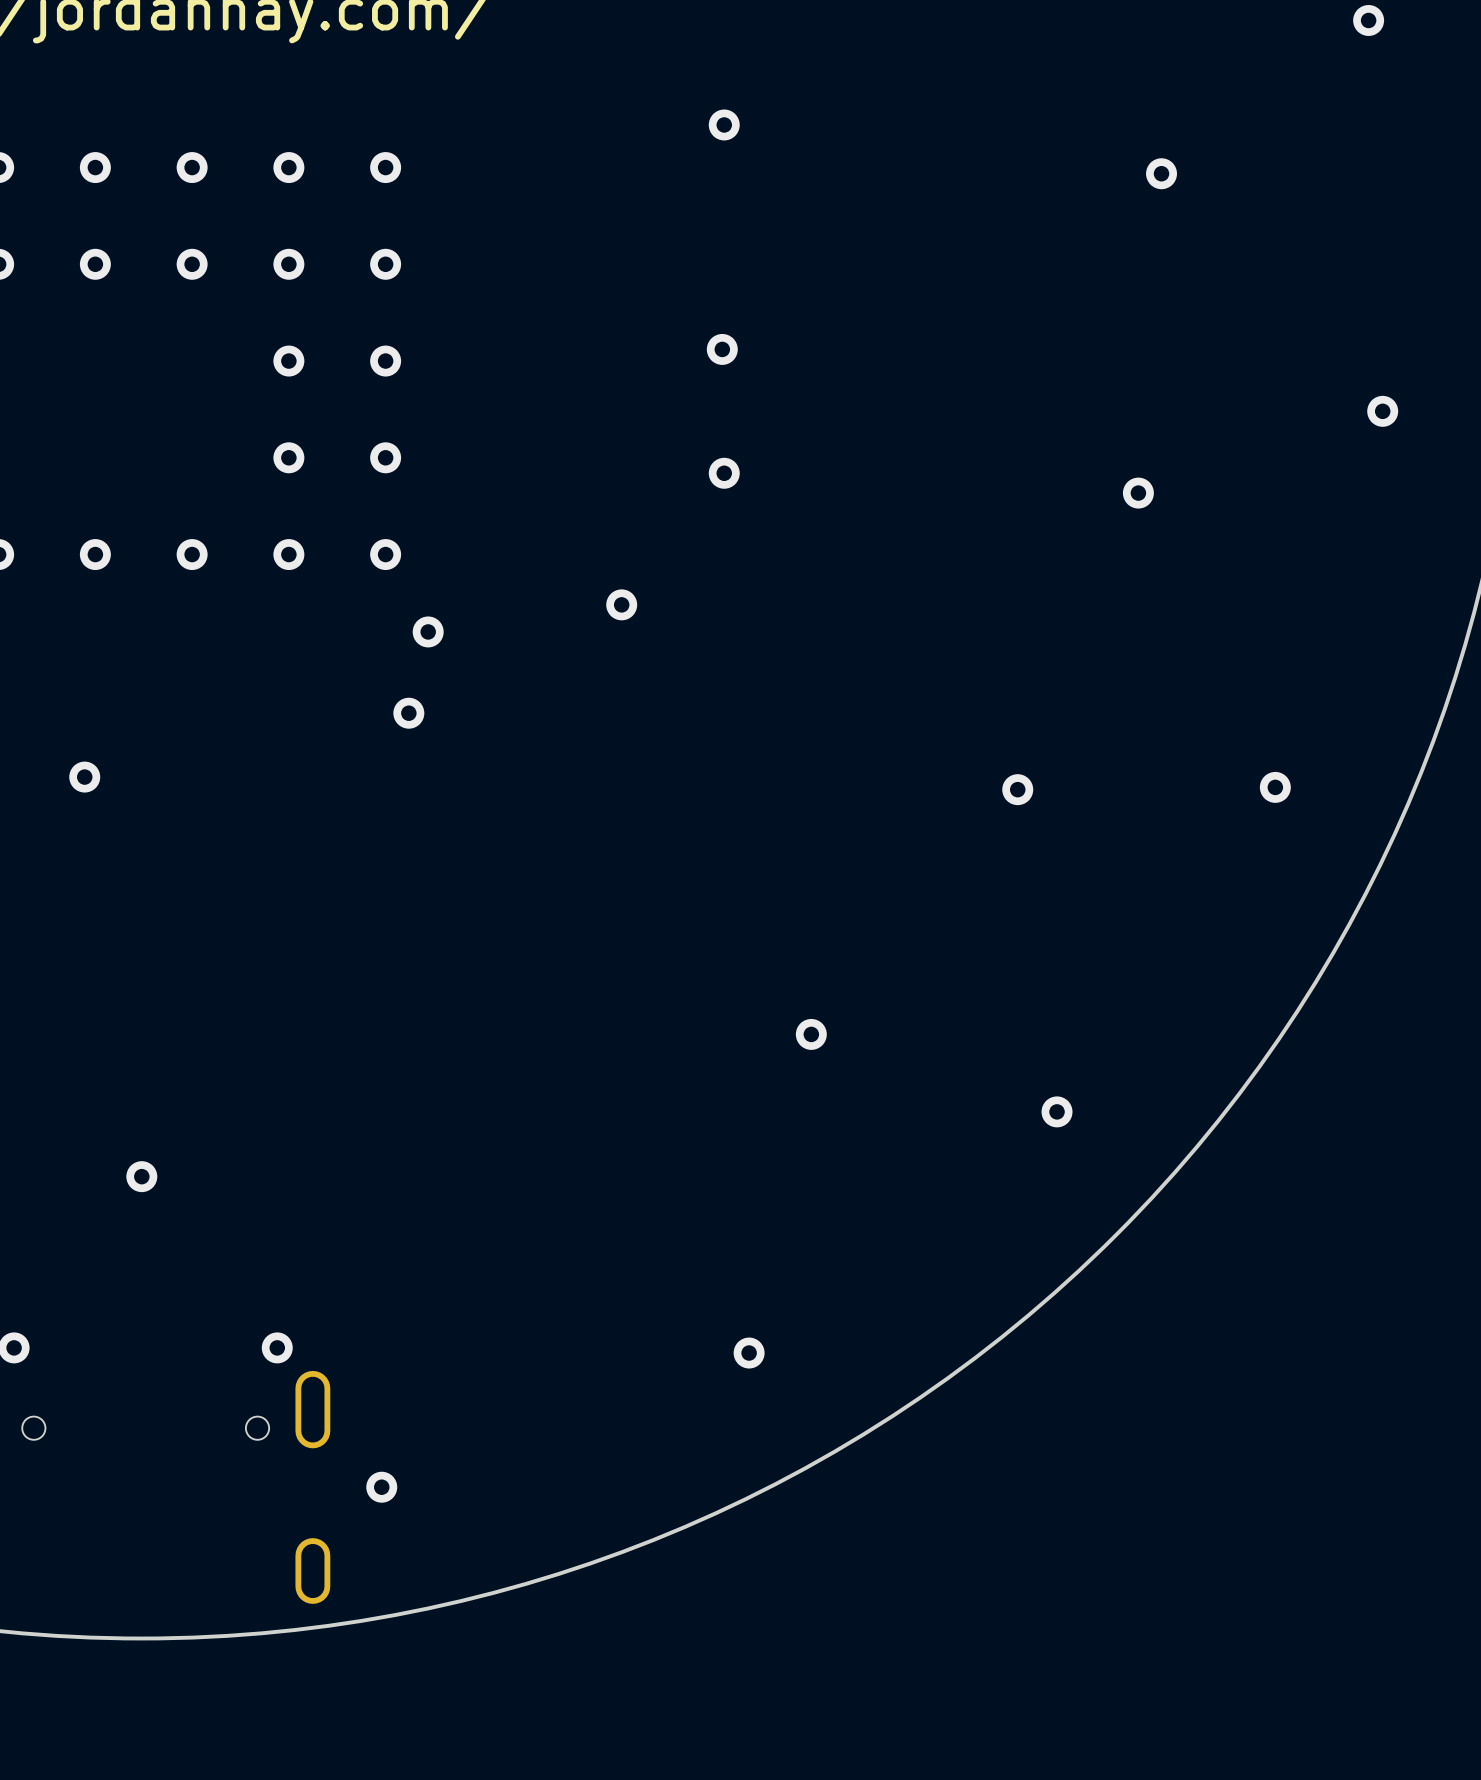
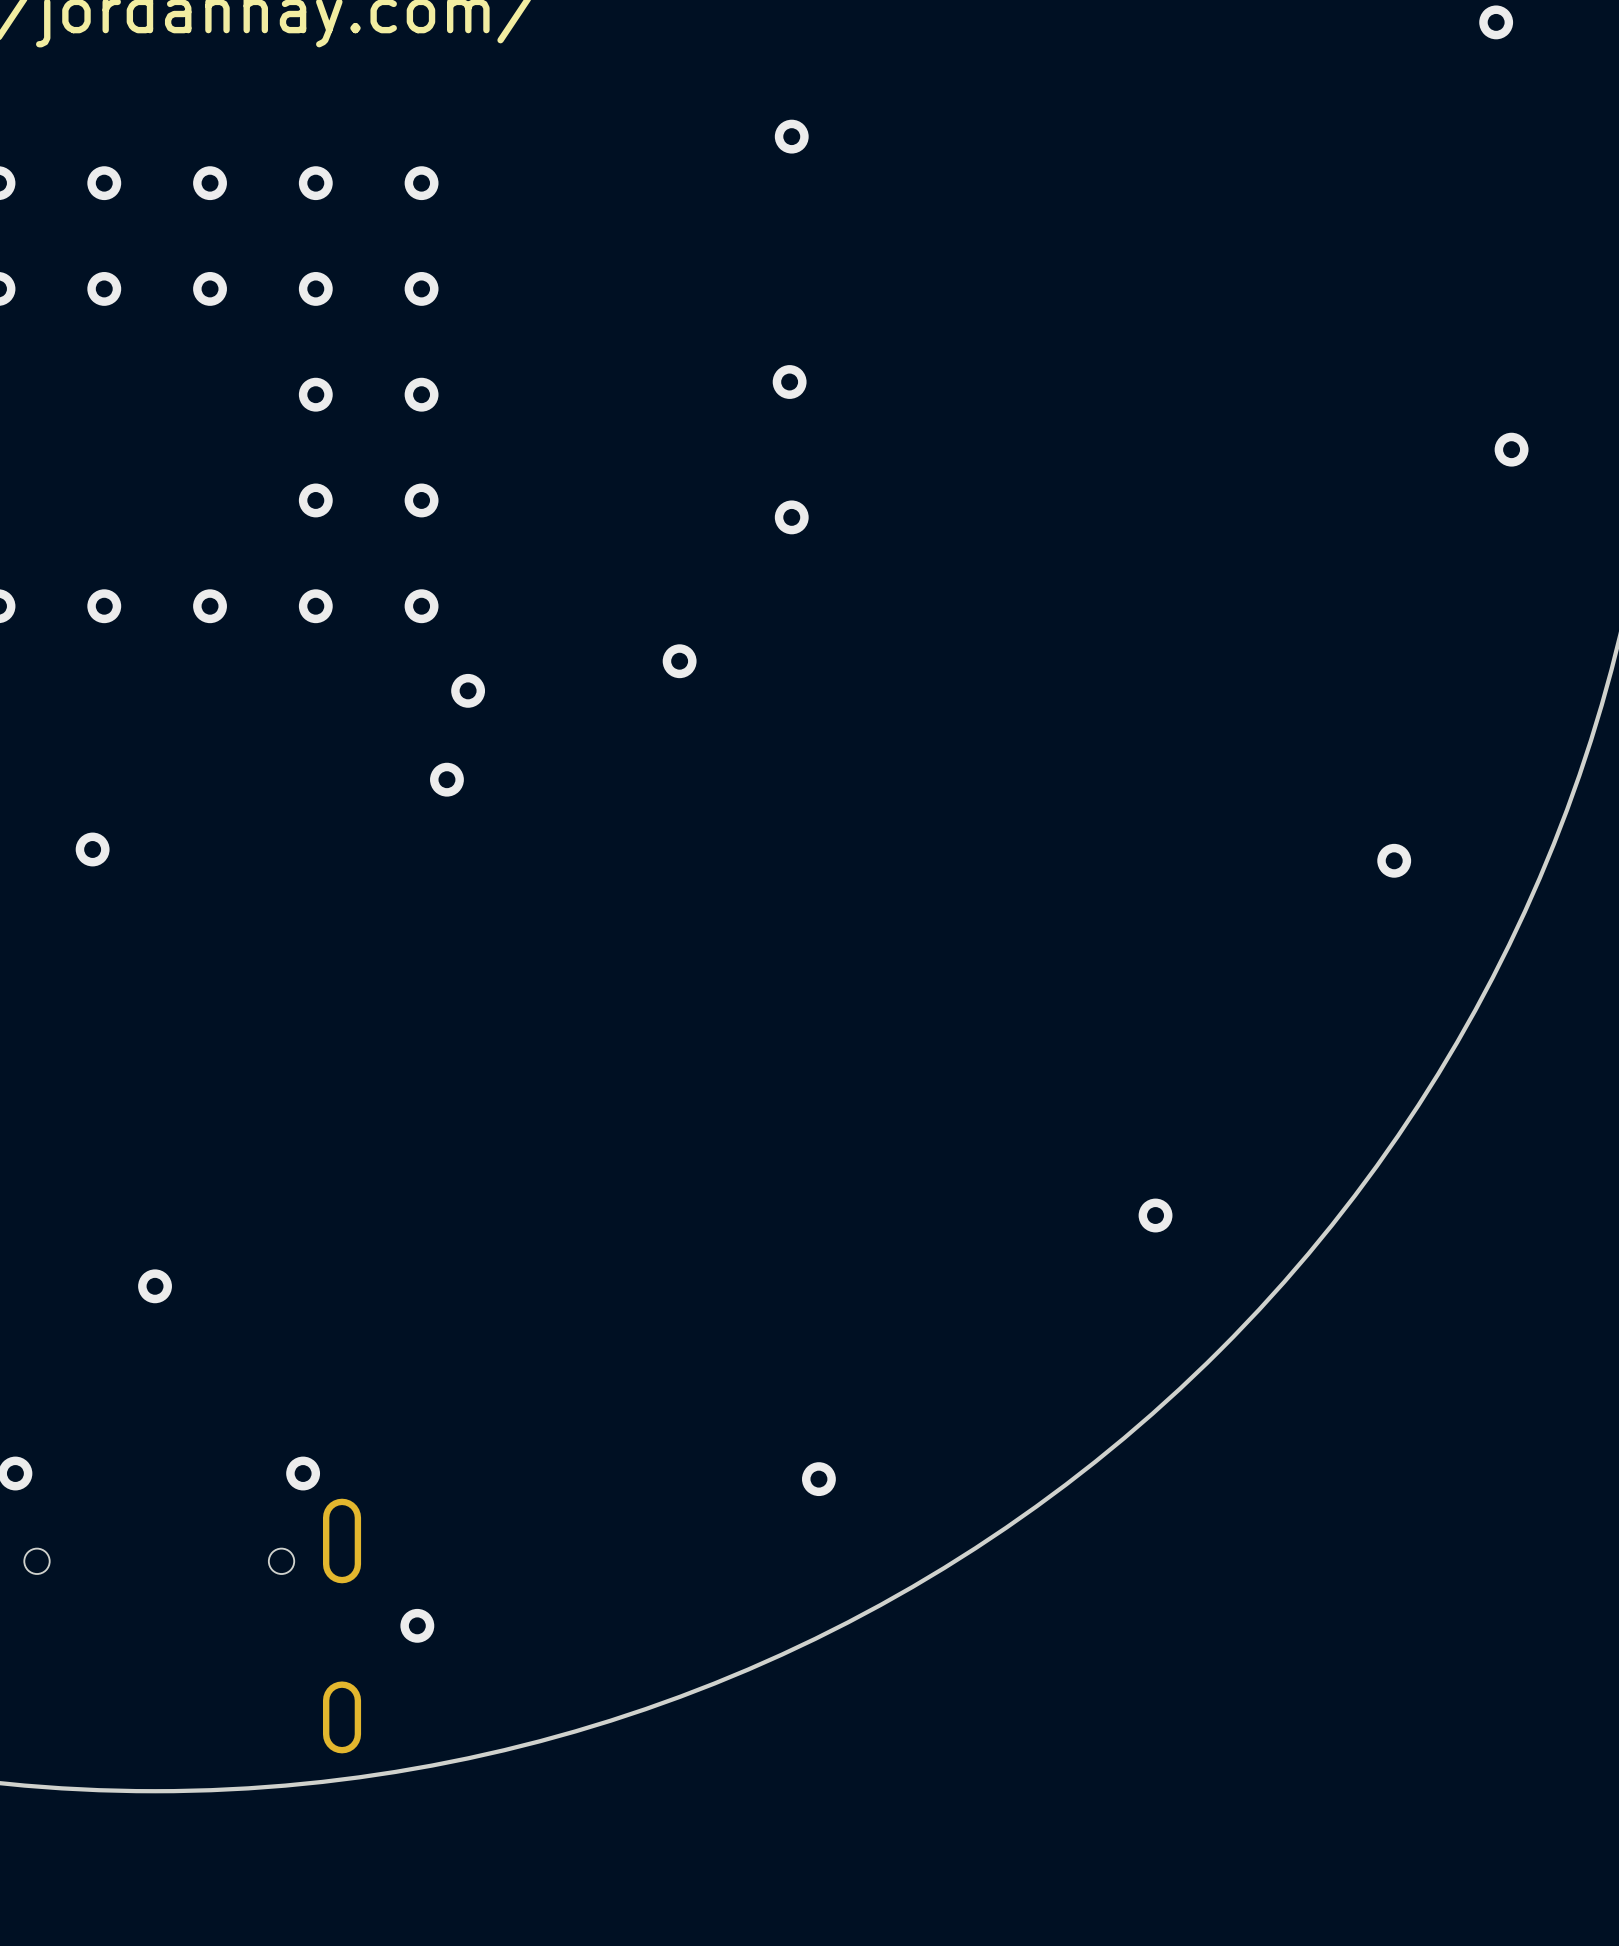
via: (1161, 173) -> none
via: (1138, 493) -> none
via: (1017, 789) -> none
via: (811, 1034) -> none

